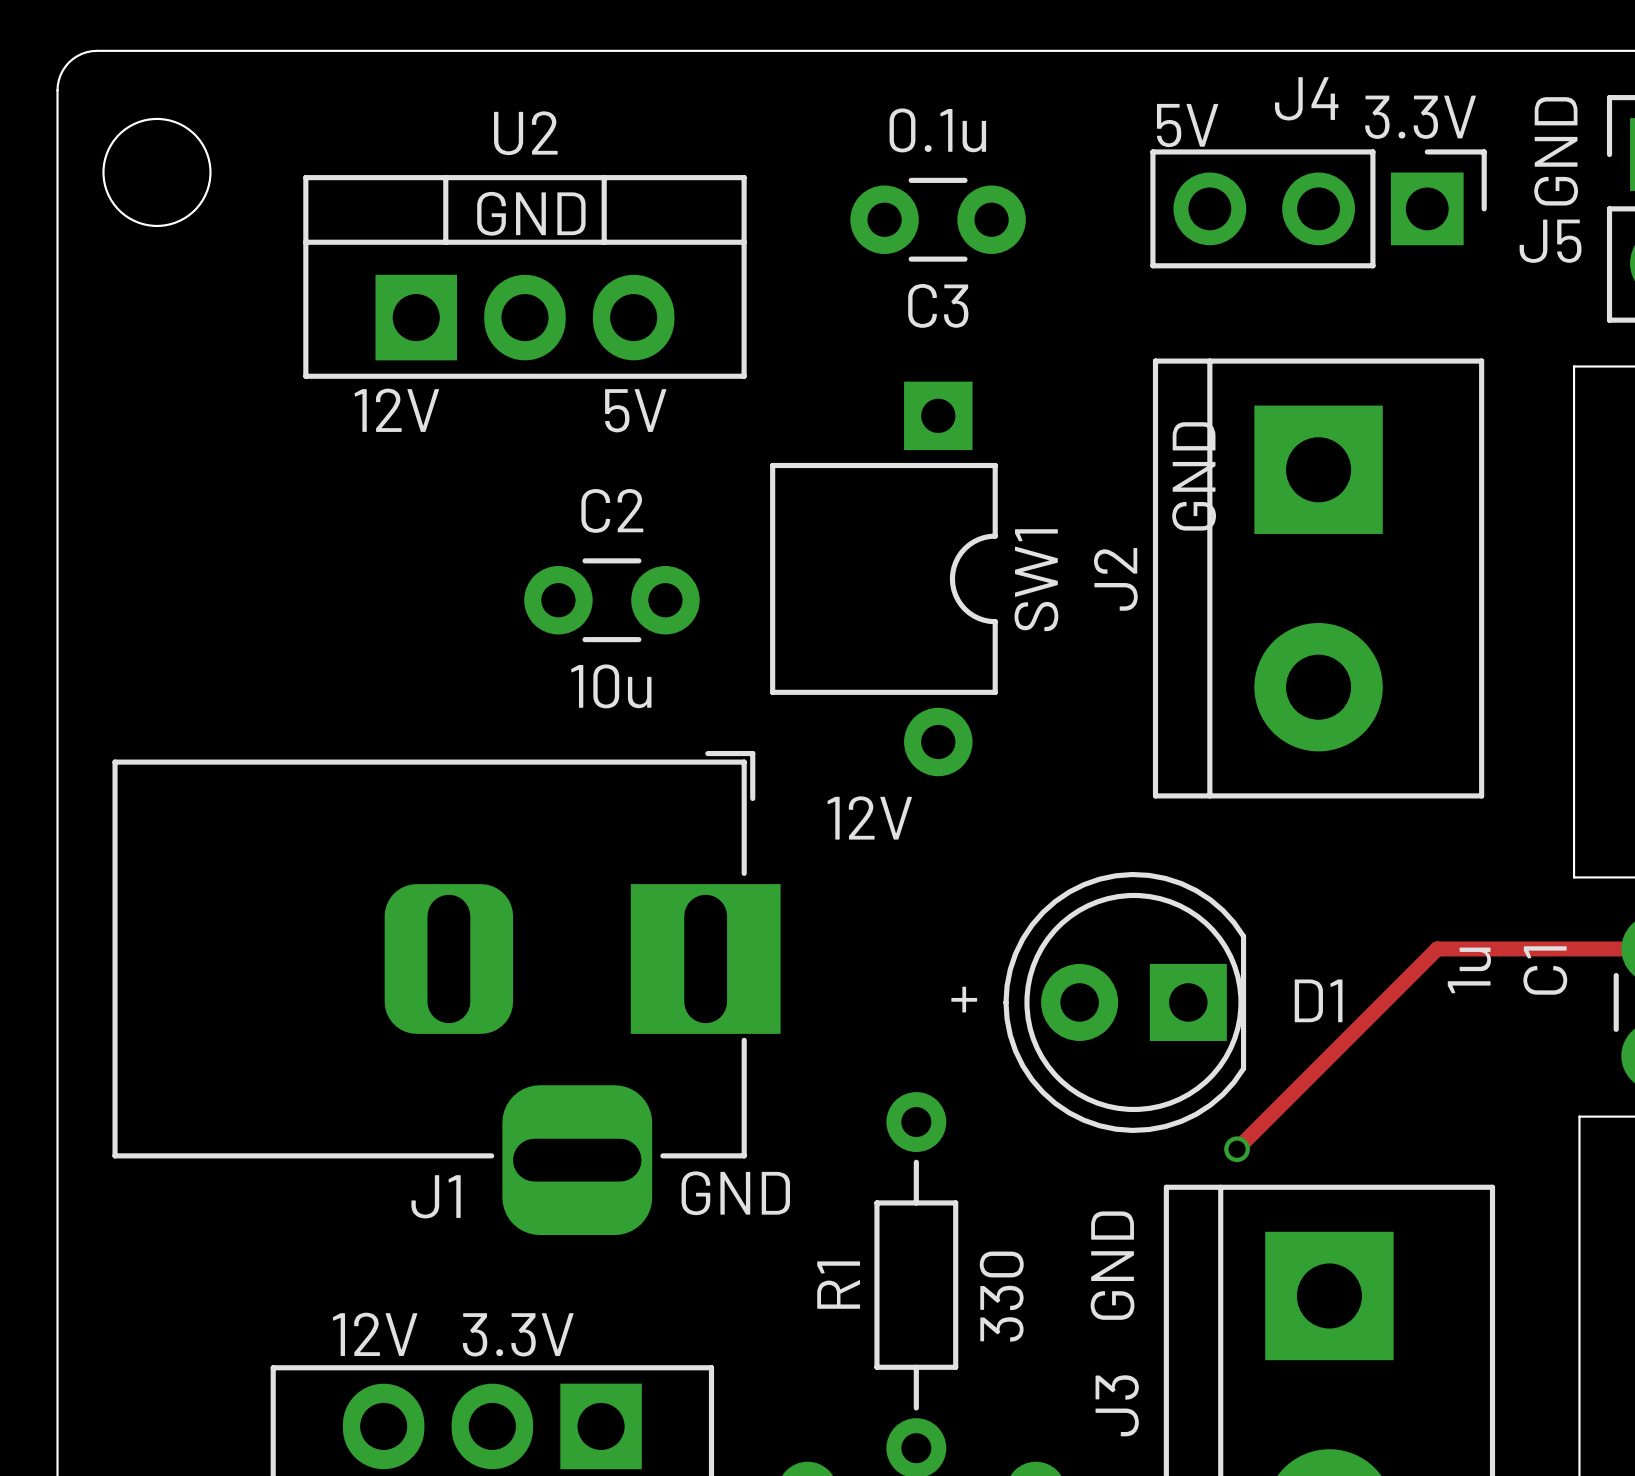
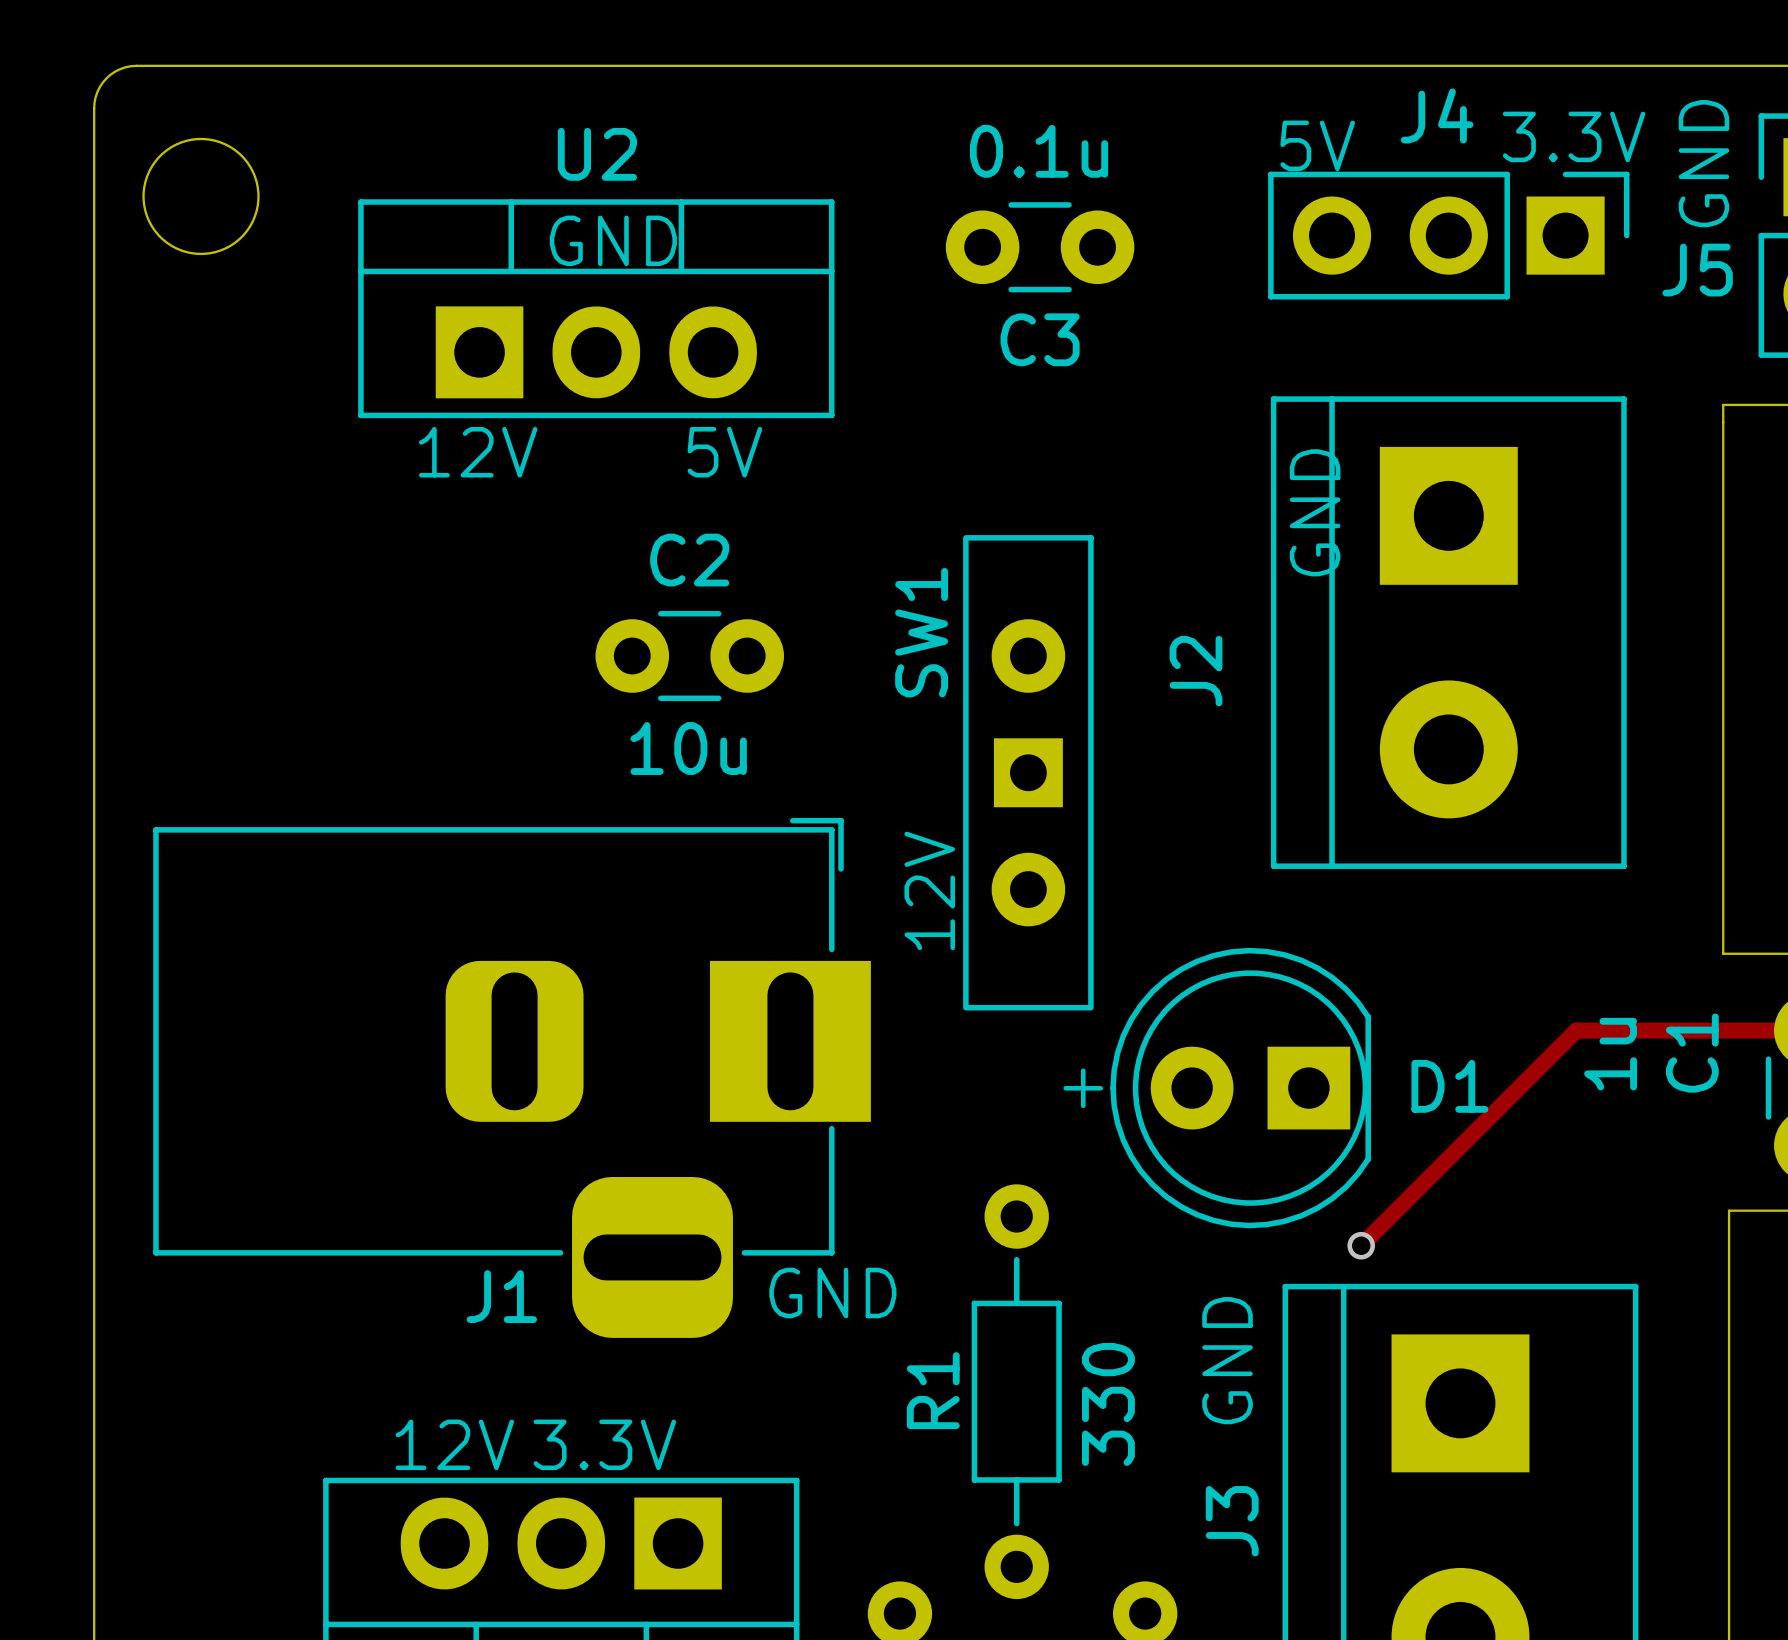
SW1 footprint: [770, 381, 998, 777] -> [963, 535, 1094, 1011]
J2 name position: J2 (1115, 579) -> J2 (1196, 671)
SW1 name position: SW1 (1036, 580) -> SW1 (921, 632)
text rotation: 0° (869, 817) -> 90° counterclockwise (929, 890)

